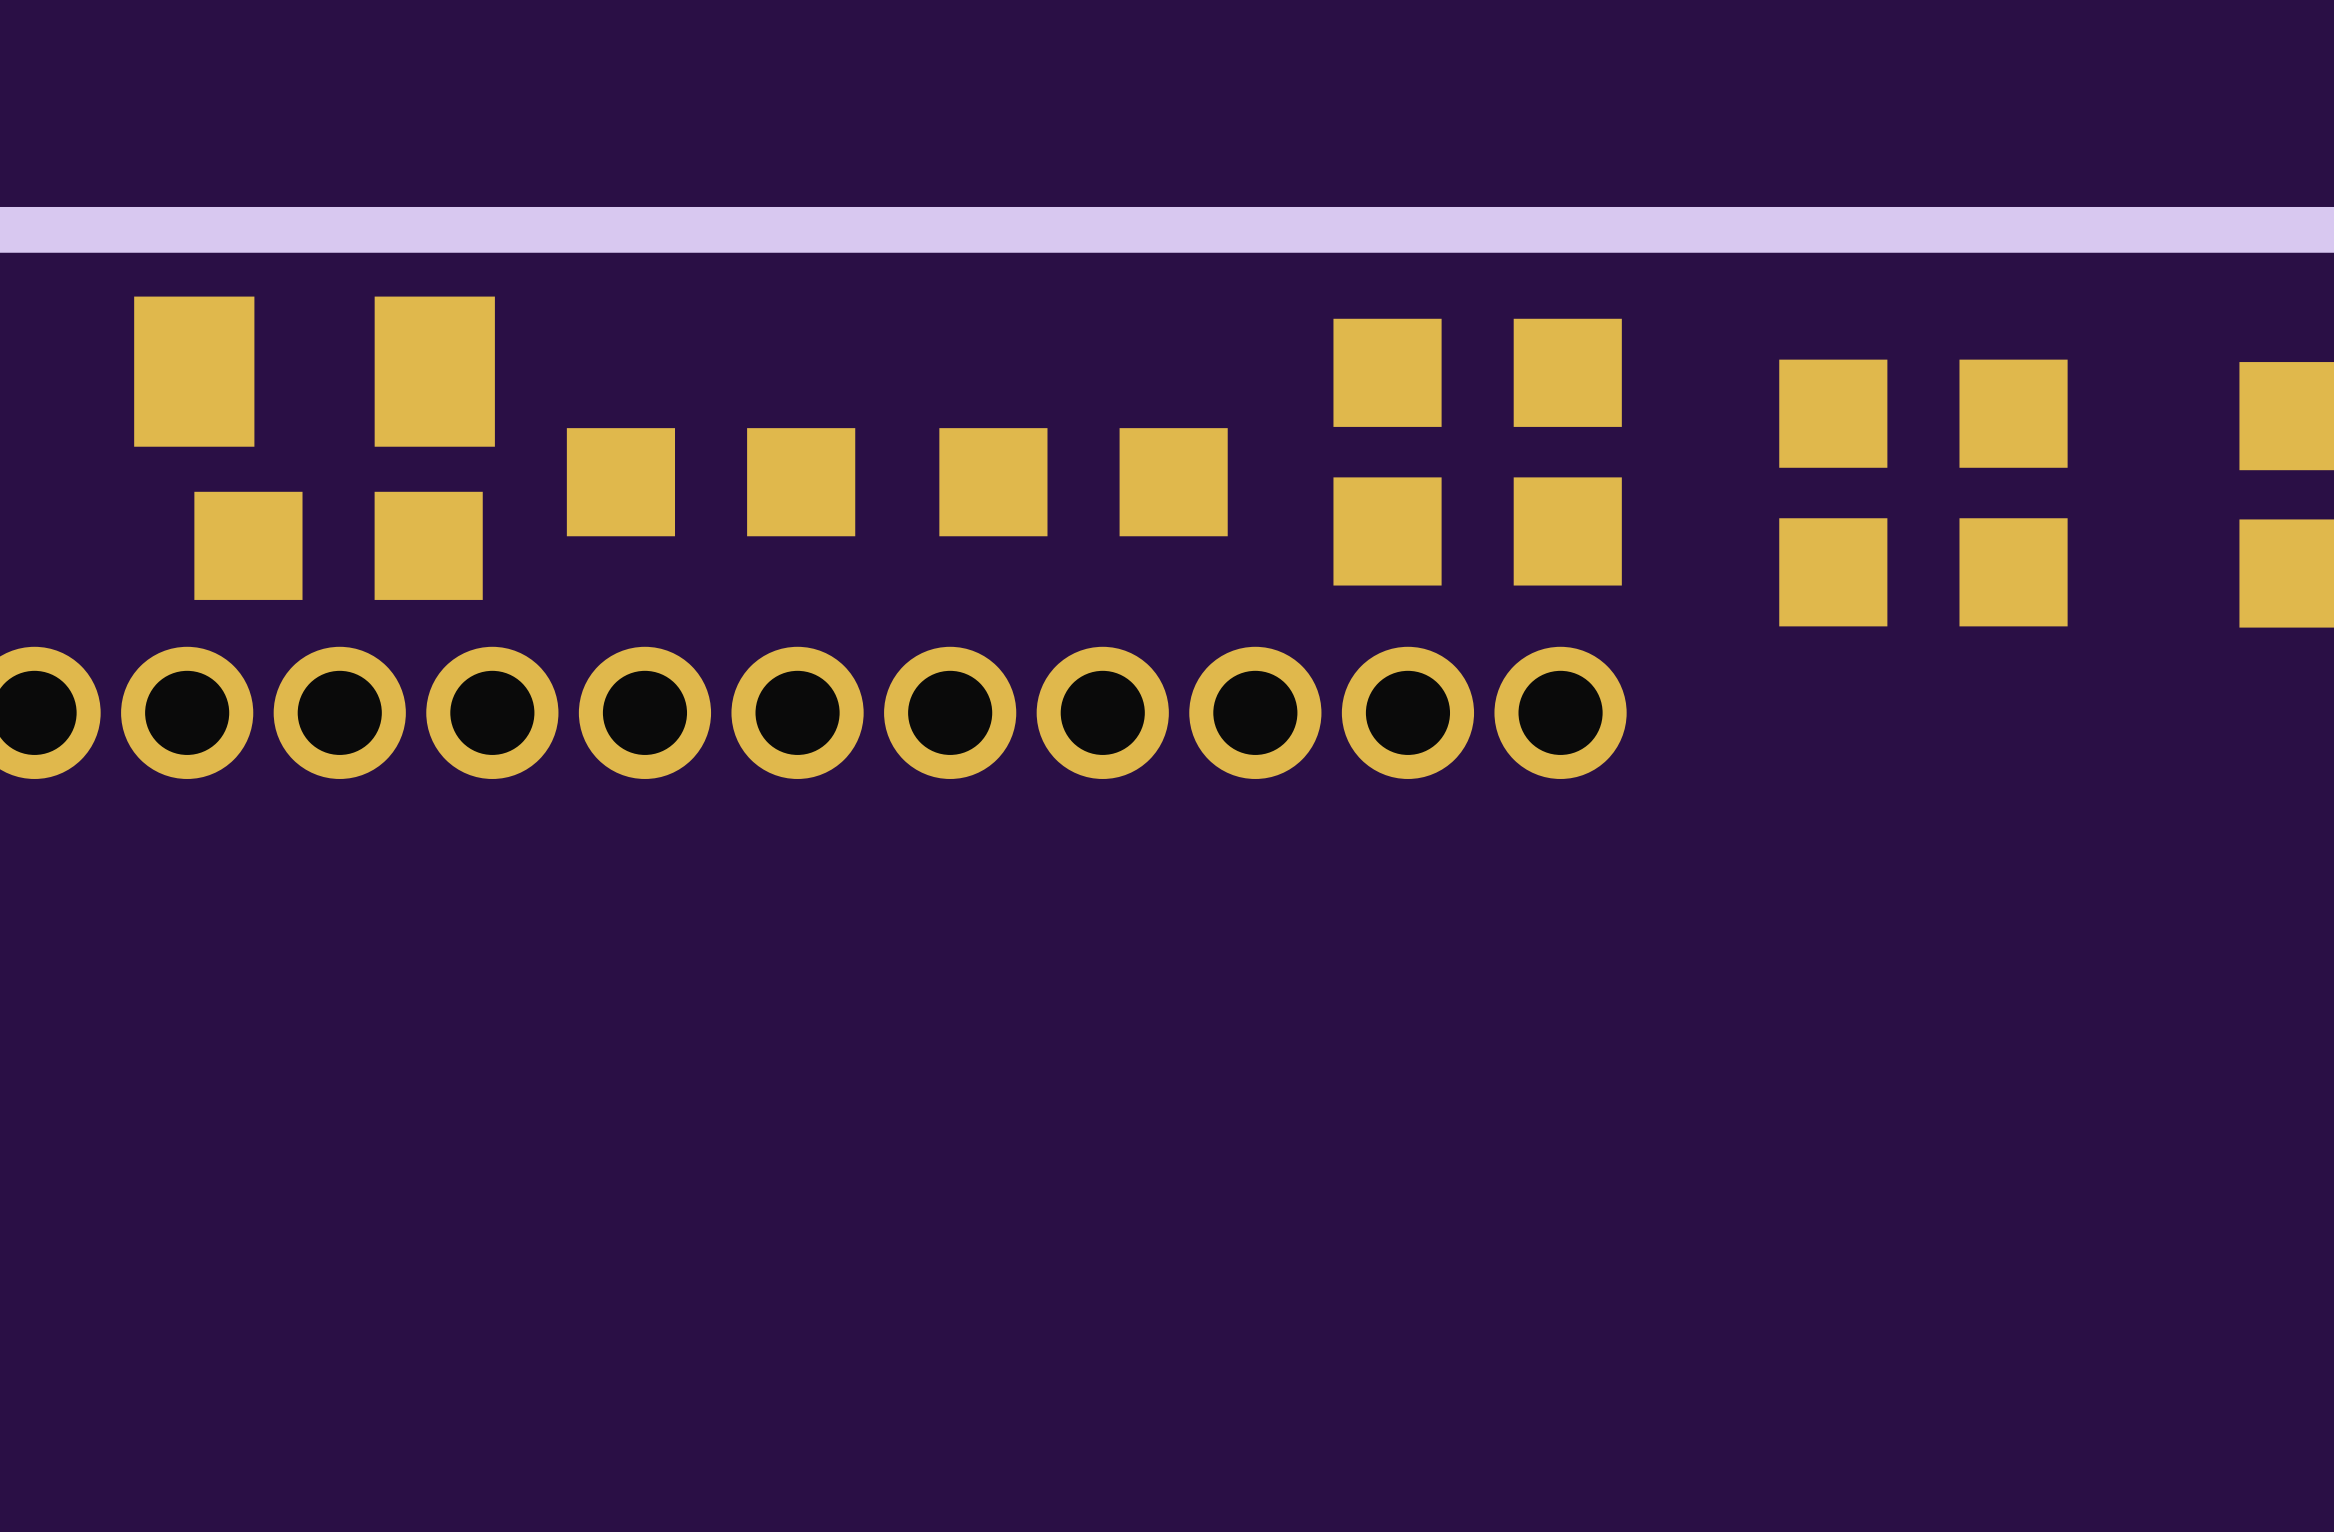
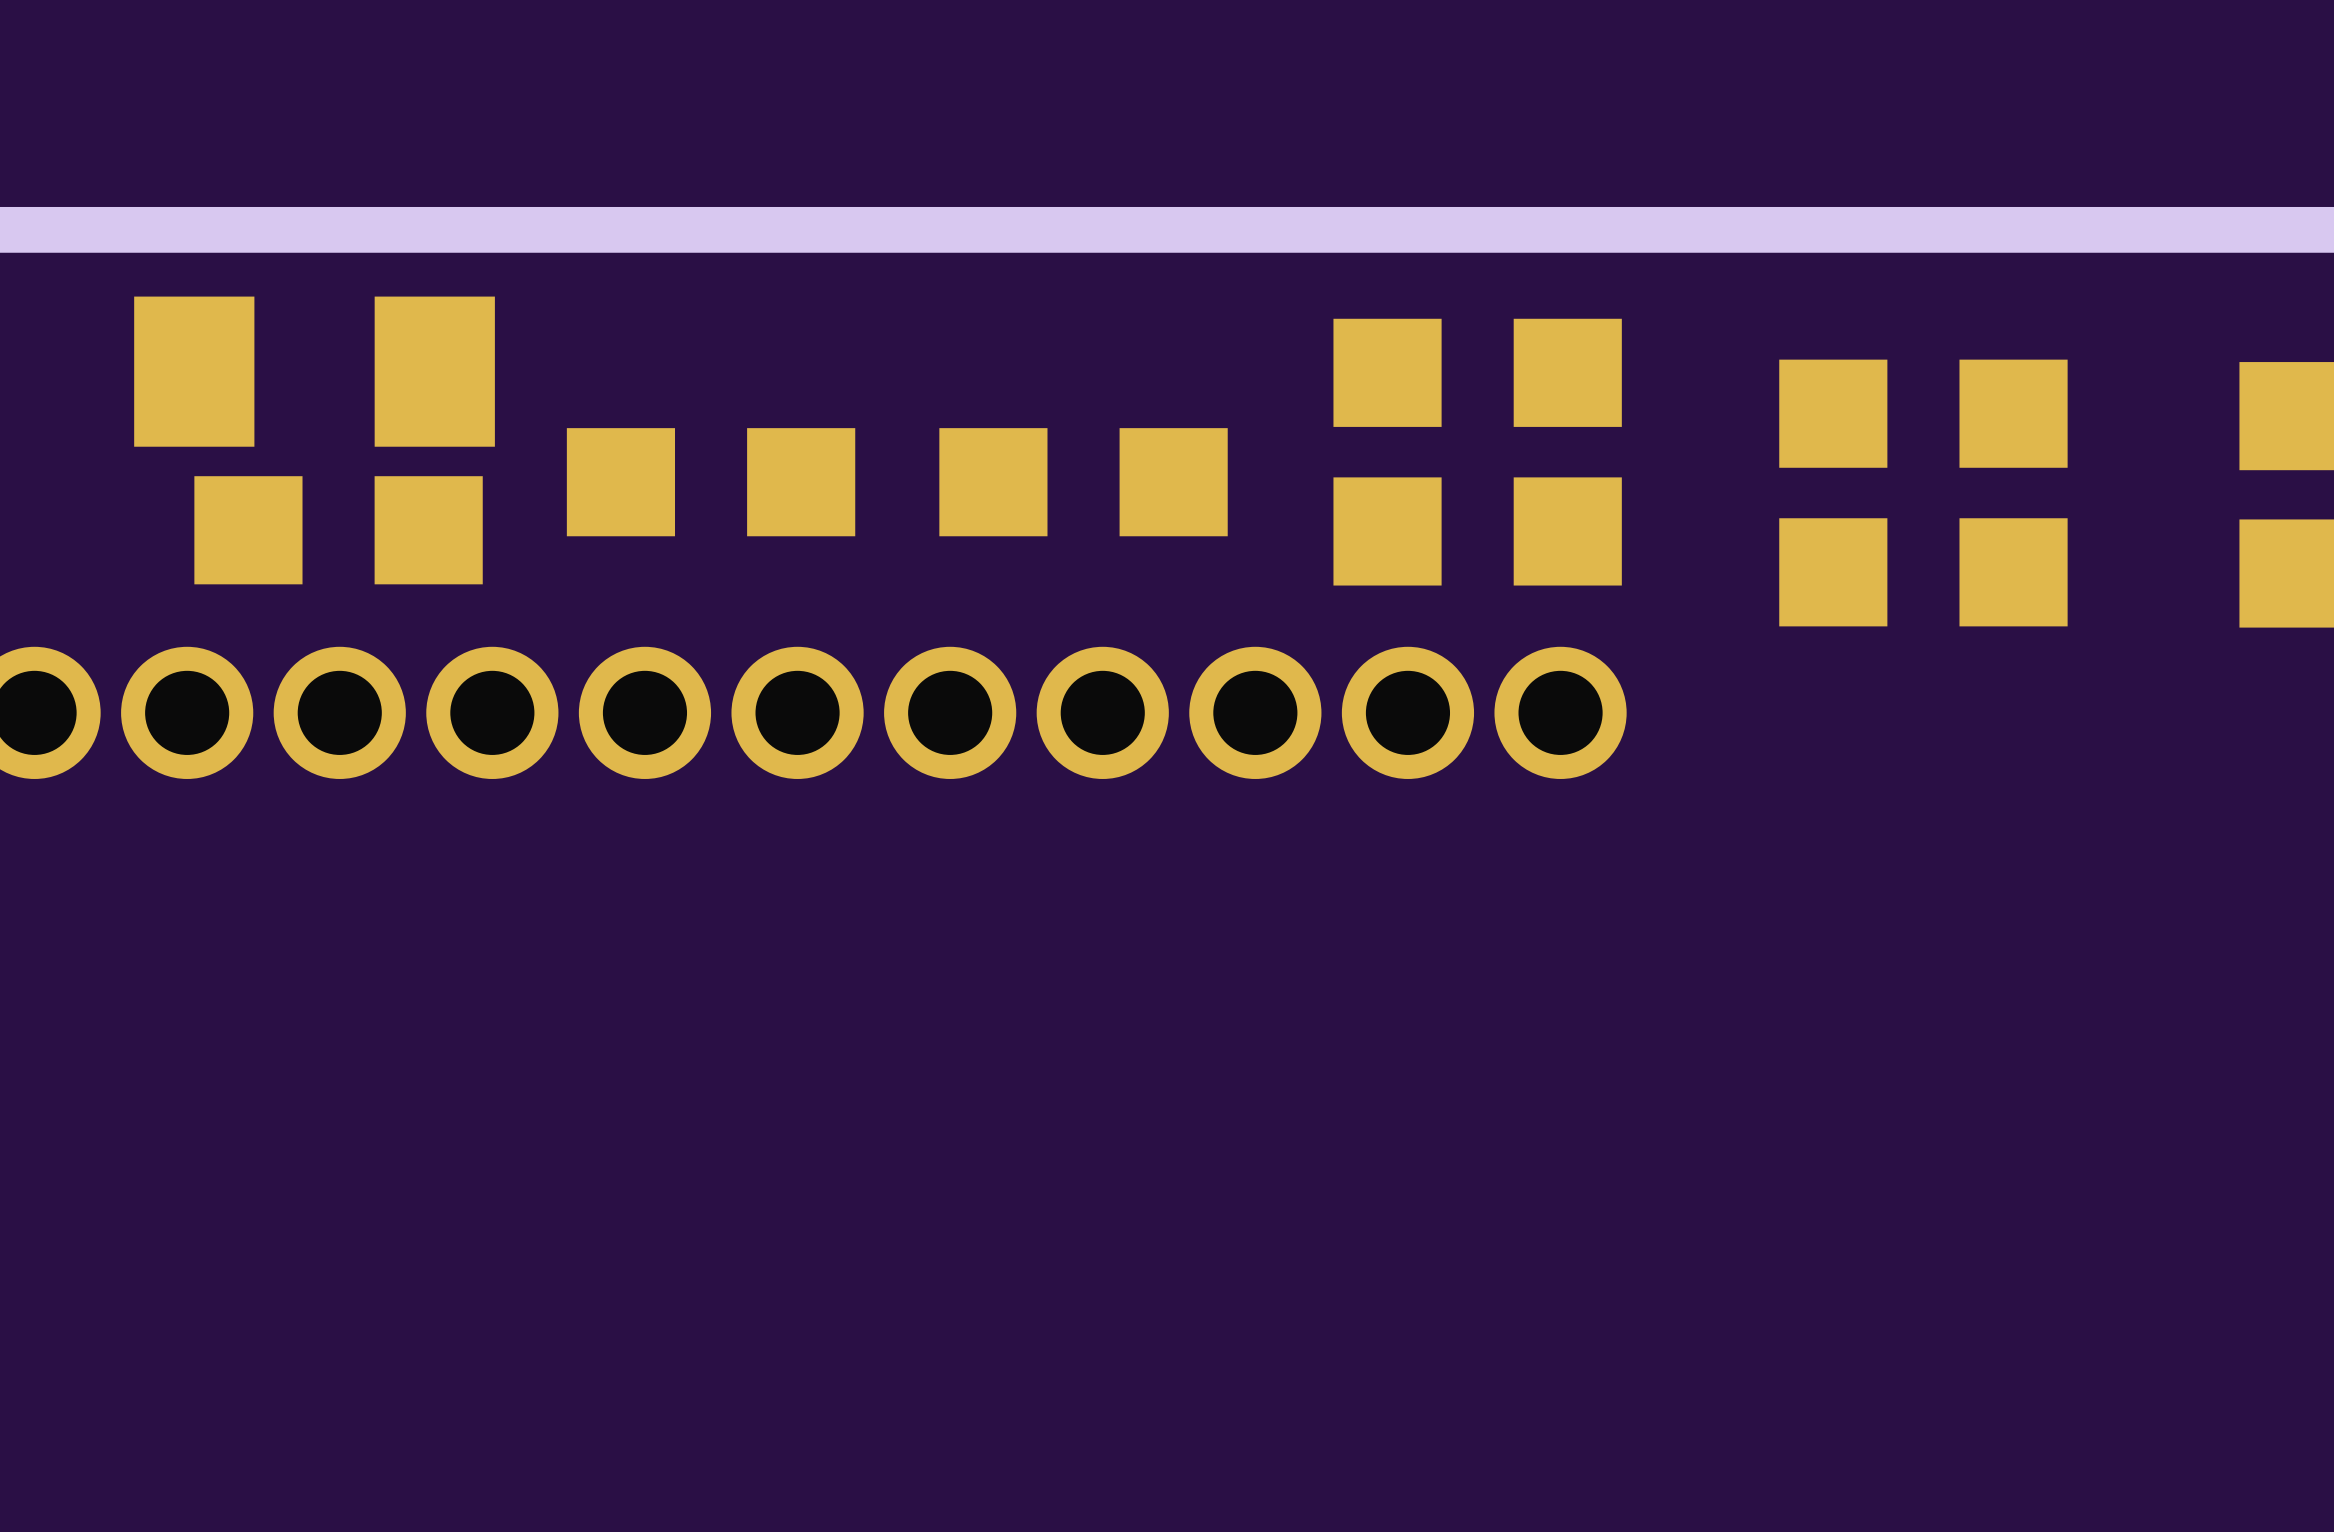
part position: (338, 545) -> (338, 530)

